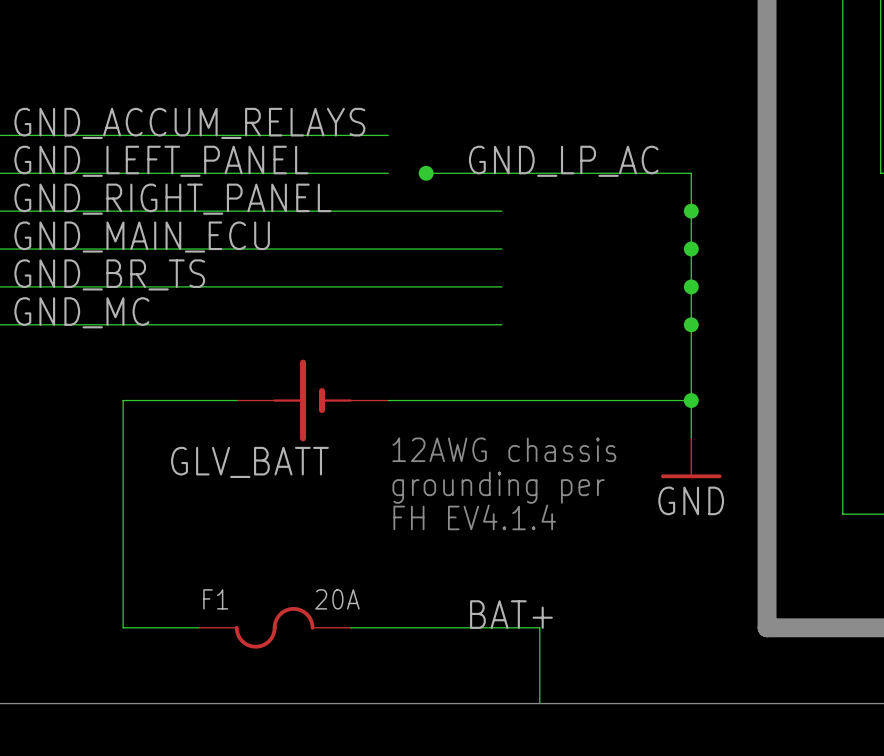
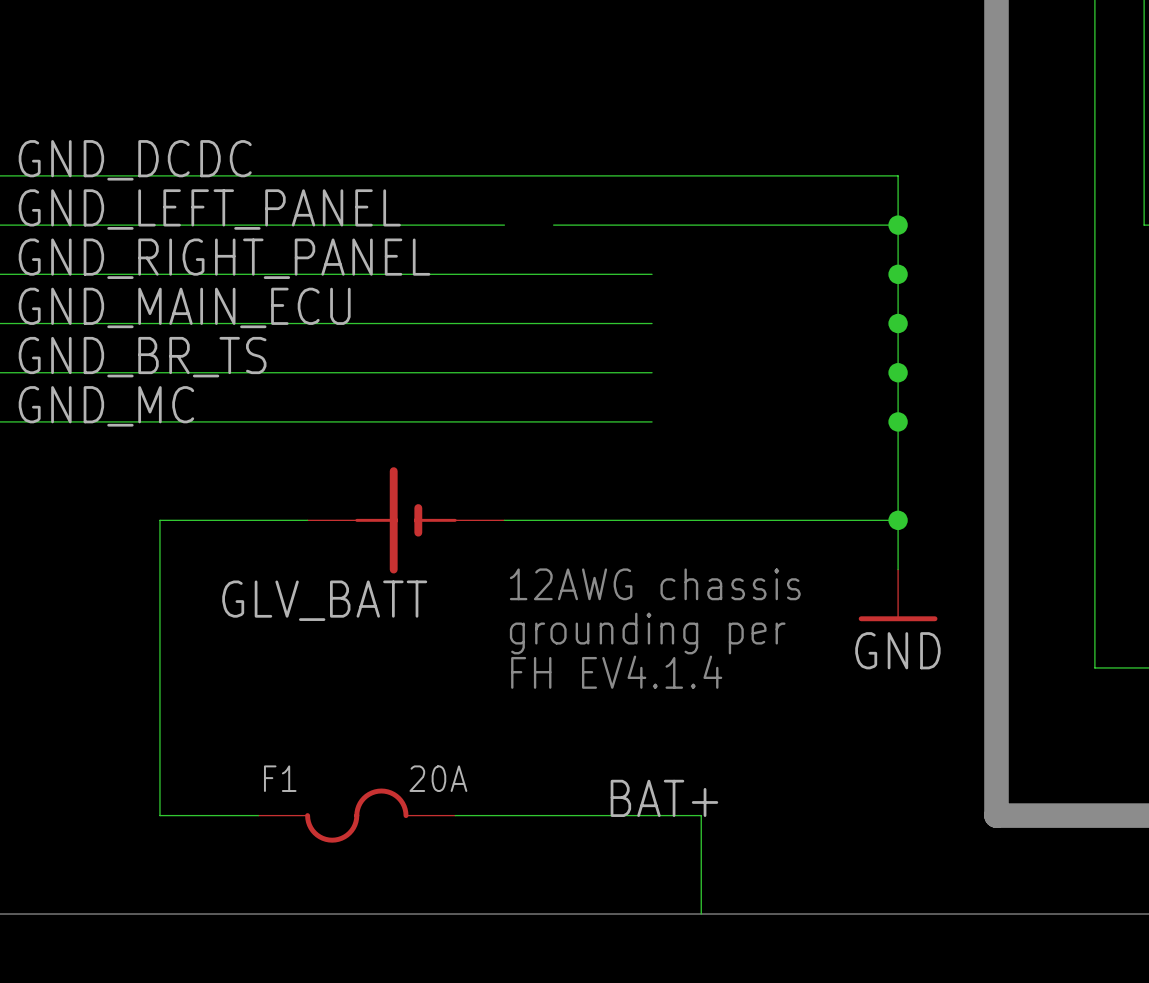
label: GND_ACCUM_RELAYS (189, 123) -> GND_DCDC (135, 160)
wire: none -> (504, 175) (898, 175) (898, 225)
label: GND_LP_AC (563, 161) -> none
junction: (426, 173) -> none
junction: none -> (898, 225)

